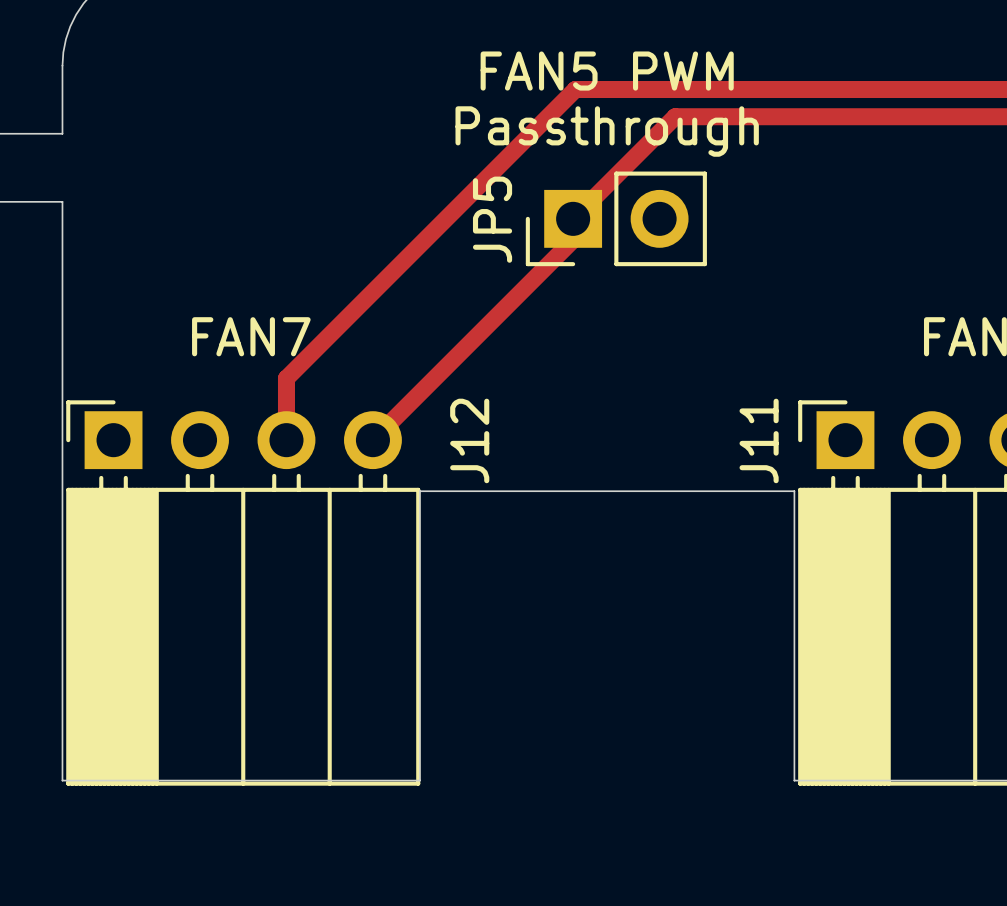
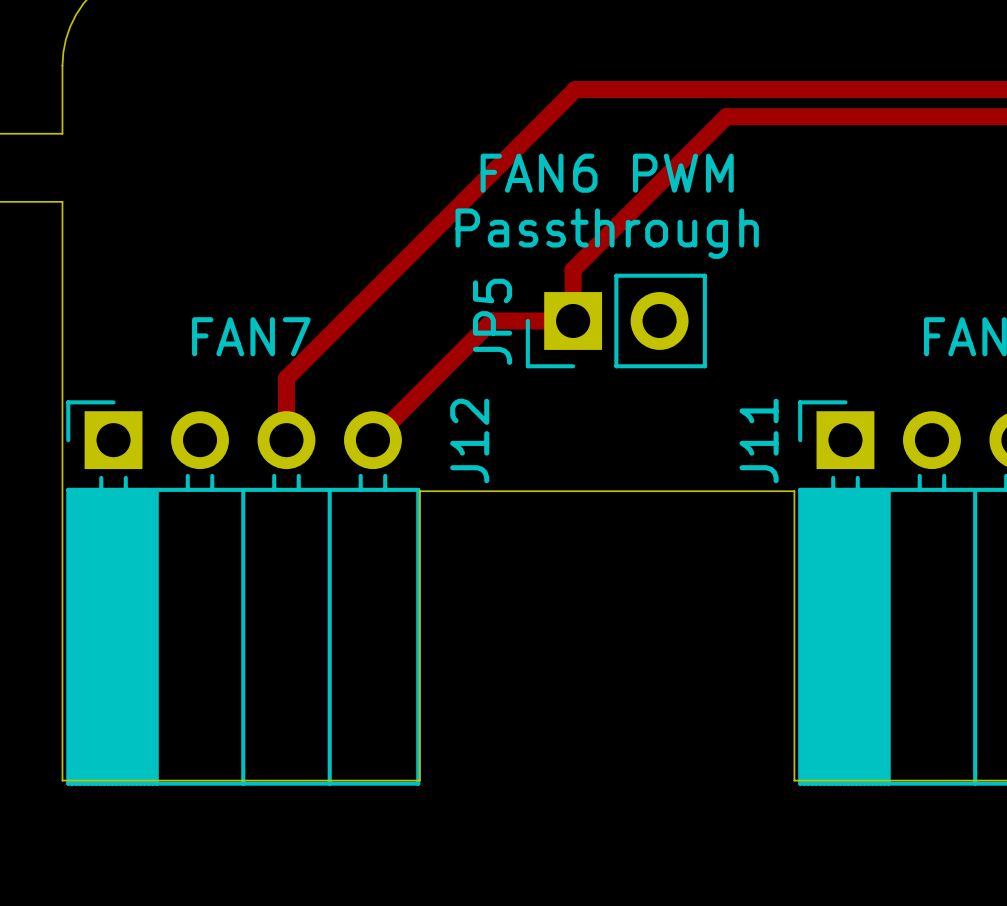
text: FAN5 PWM (607, 71) -> none
track: (726, 116) (675, 116) (573, 218) (573, 239) (492, 320) -> (726, 116) (573, 269) (573, 320) (492, 320)
text position: Passthrough (607, 131) -> Passthrough (607, 233)
text: none -> FAN6 PWM (607, 173)
JP5 position: (616, 218) -> (616, 320)

